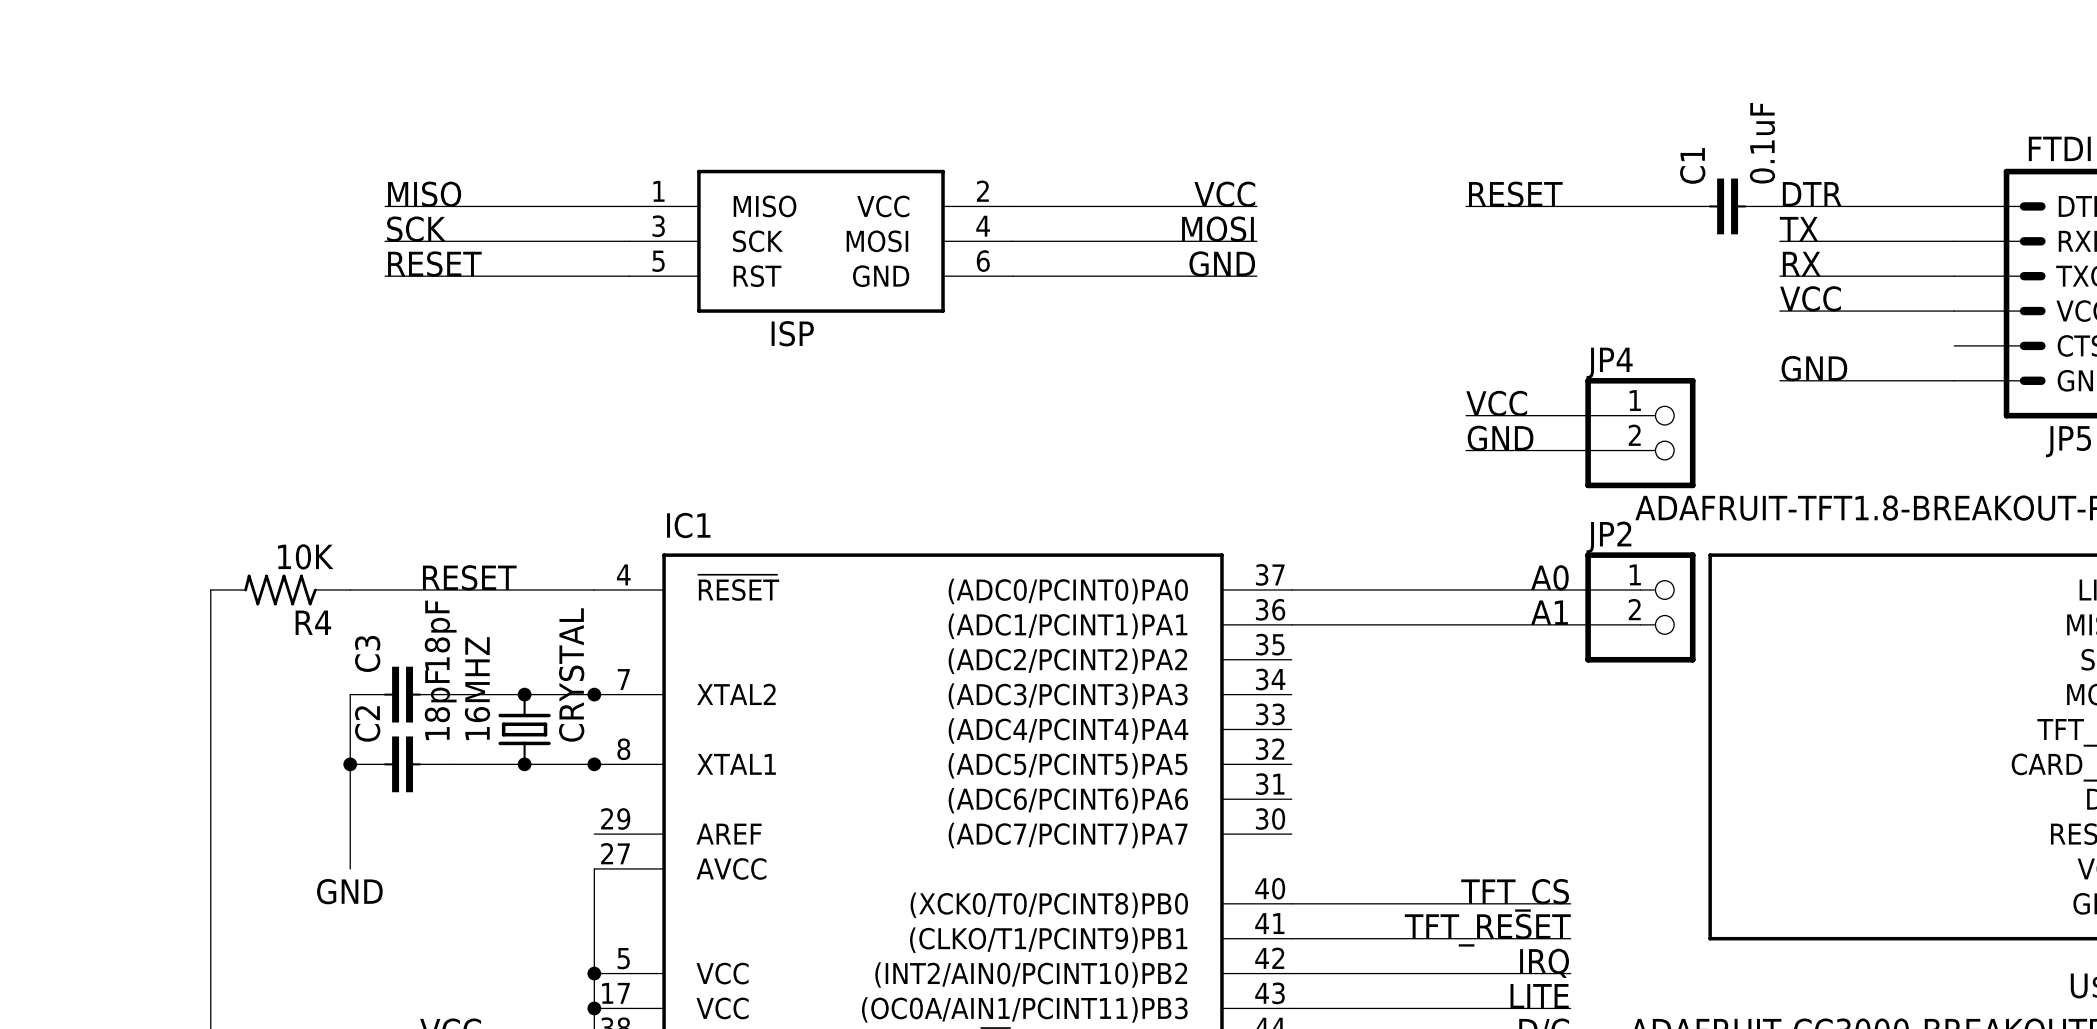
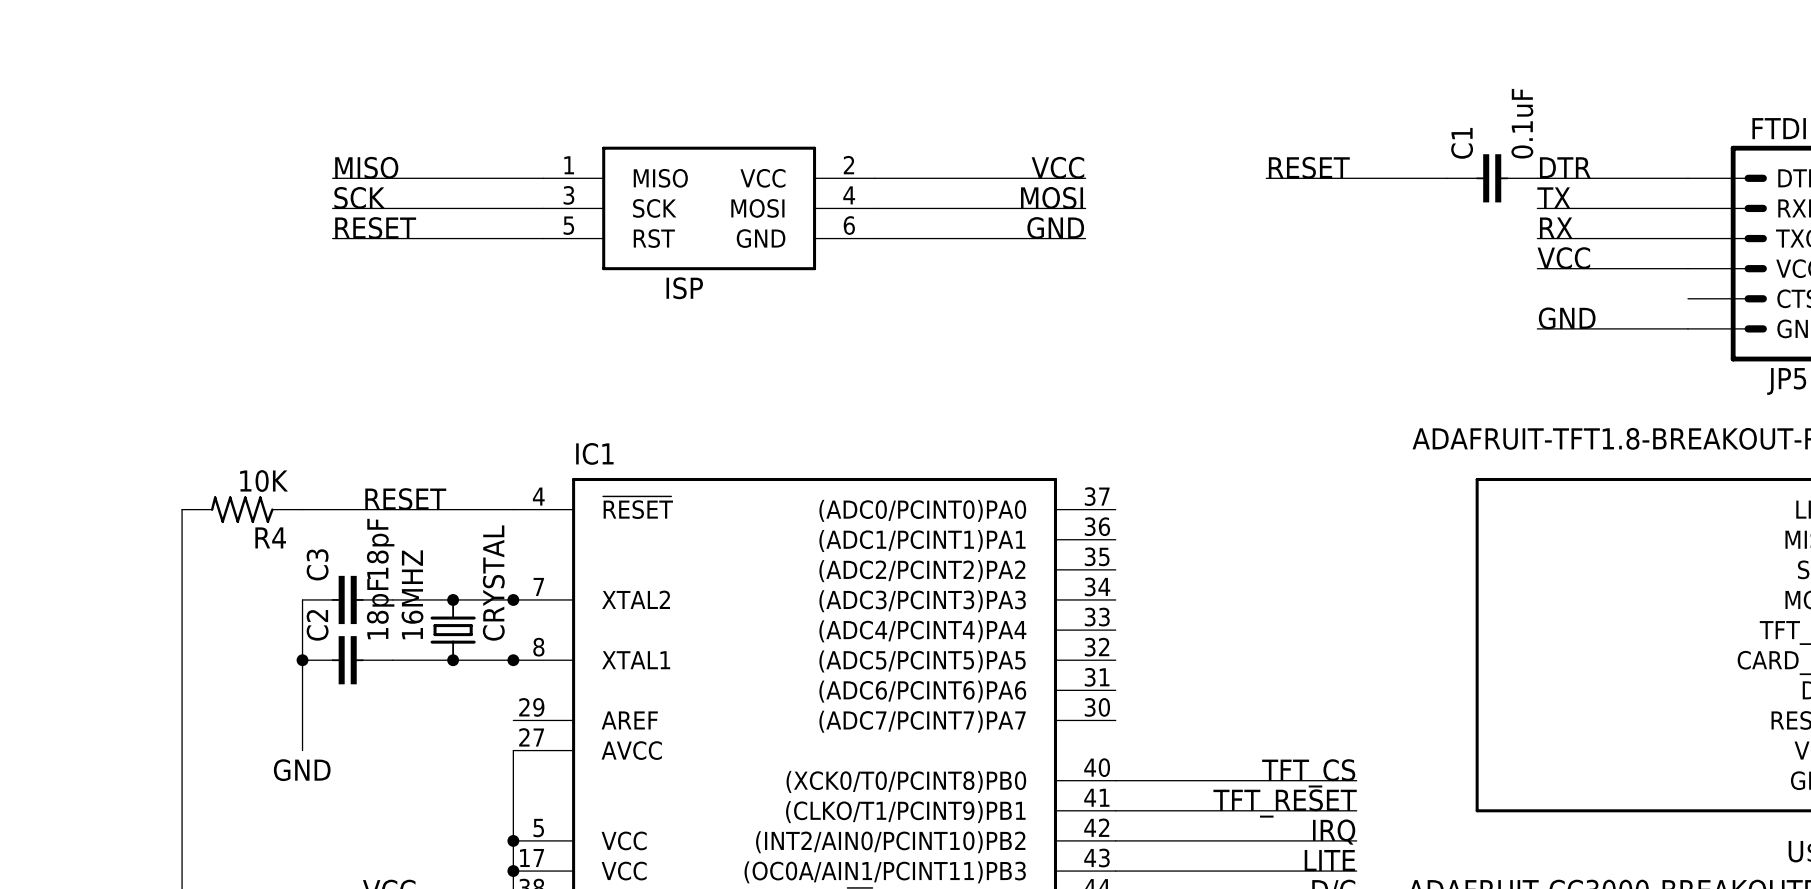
label: VCC (1496, 403) -> none
wire: (1466, 415) (1640, 415) -> none
JP4: (1640, 433) -> none
label: GND (1500, 438) -> none
wire: (1466, 450) (1640, 450) -> none
label: A0 (1549, 577) -> none
wire: (1291, 590) (1640, 590) -> none
JP2: (1640, 607) -> none
label: A1 (1549, 612) -> none
wire: (1291, 624) (1640, 624) -> none

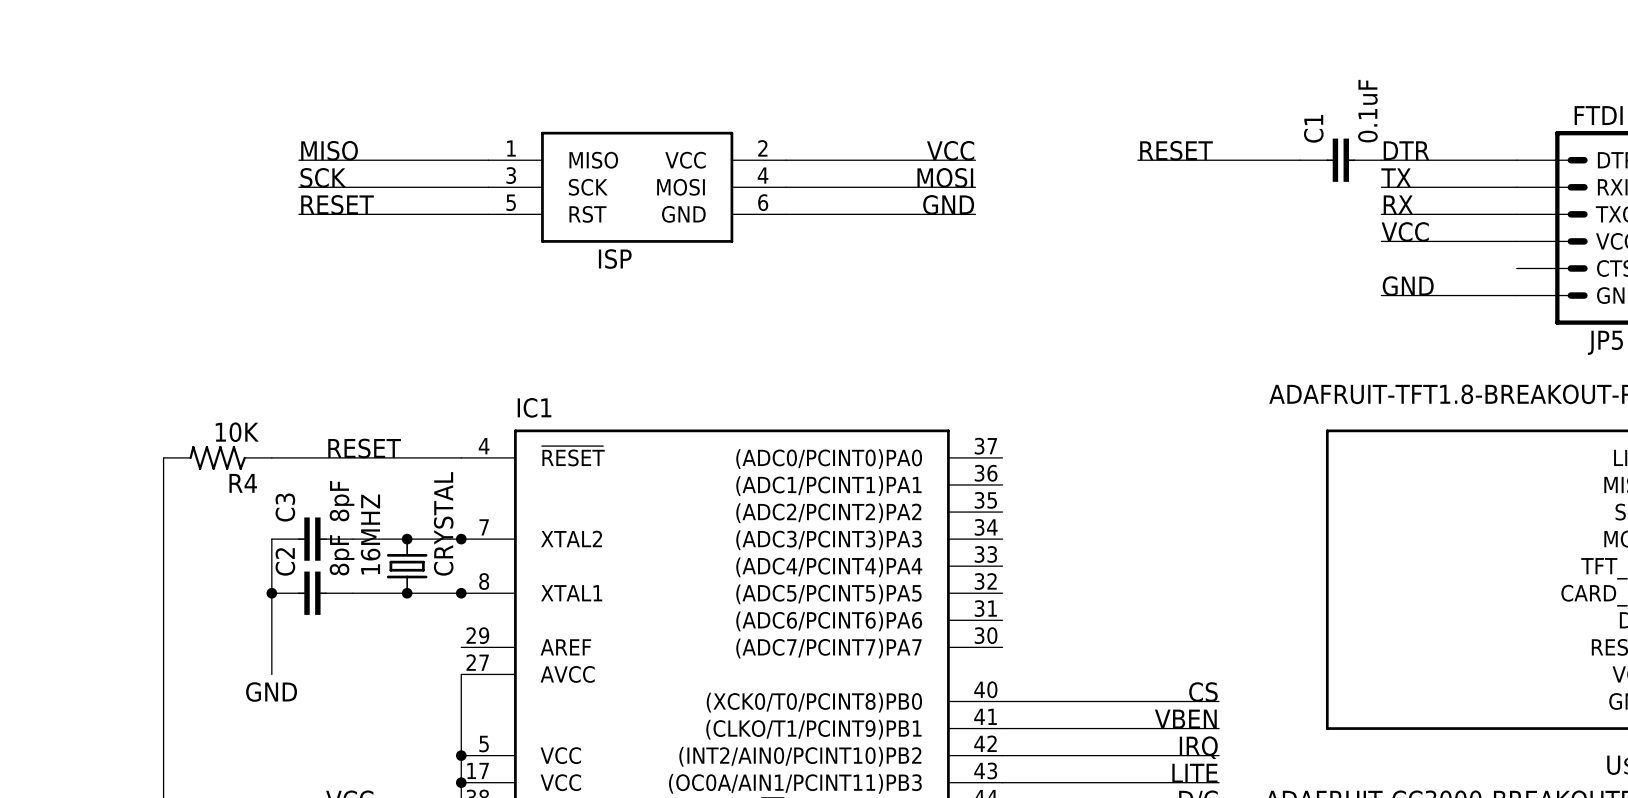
C3 value: 18pF (380, 548) -> 8pF (342, 501)
C2 value: 18pF (380, 609) -> 8pF (342, 555)
label: TFT_CS (1308, 773) -> CS (1203, 692)
label: TFT_RESET (1285, 803) -> VBEN (1185, 719)

